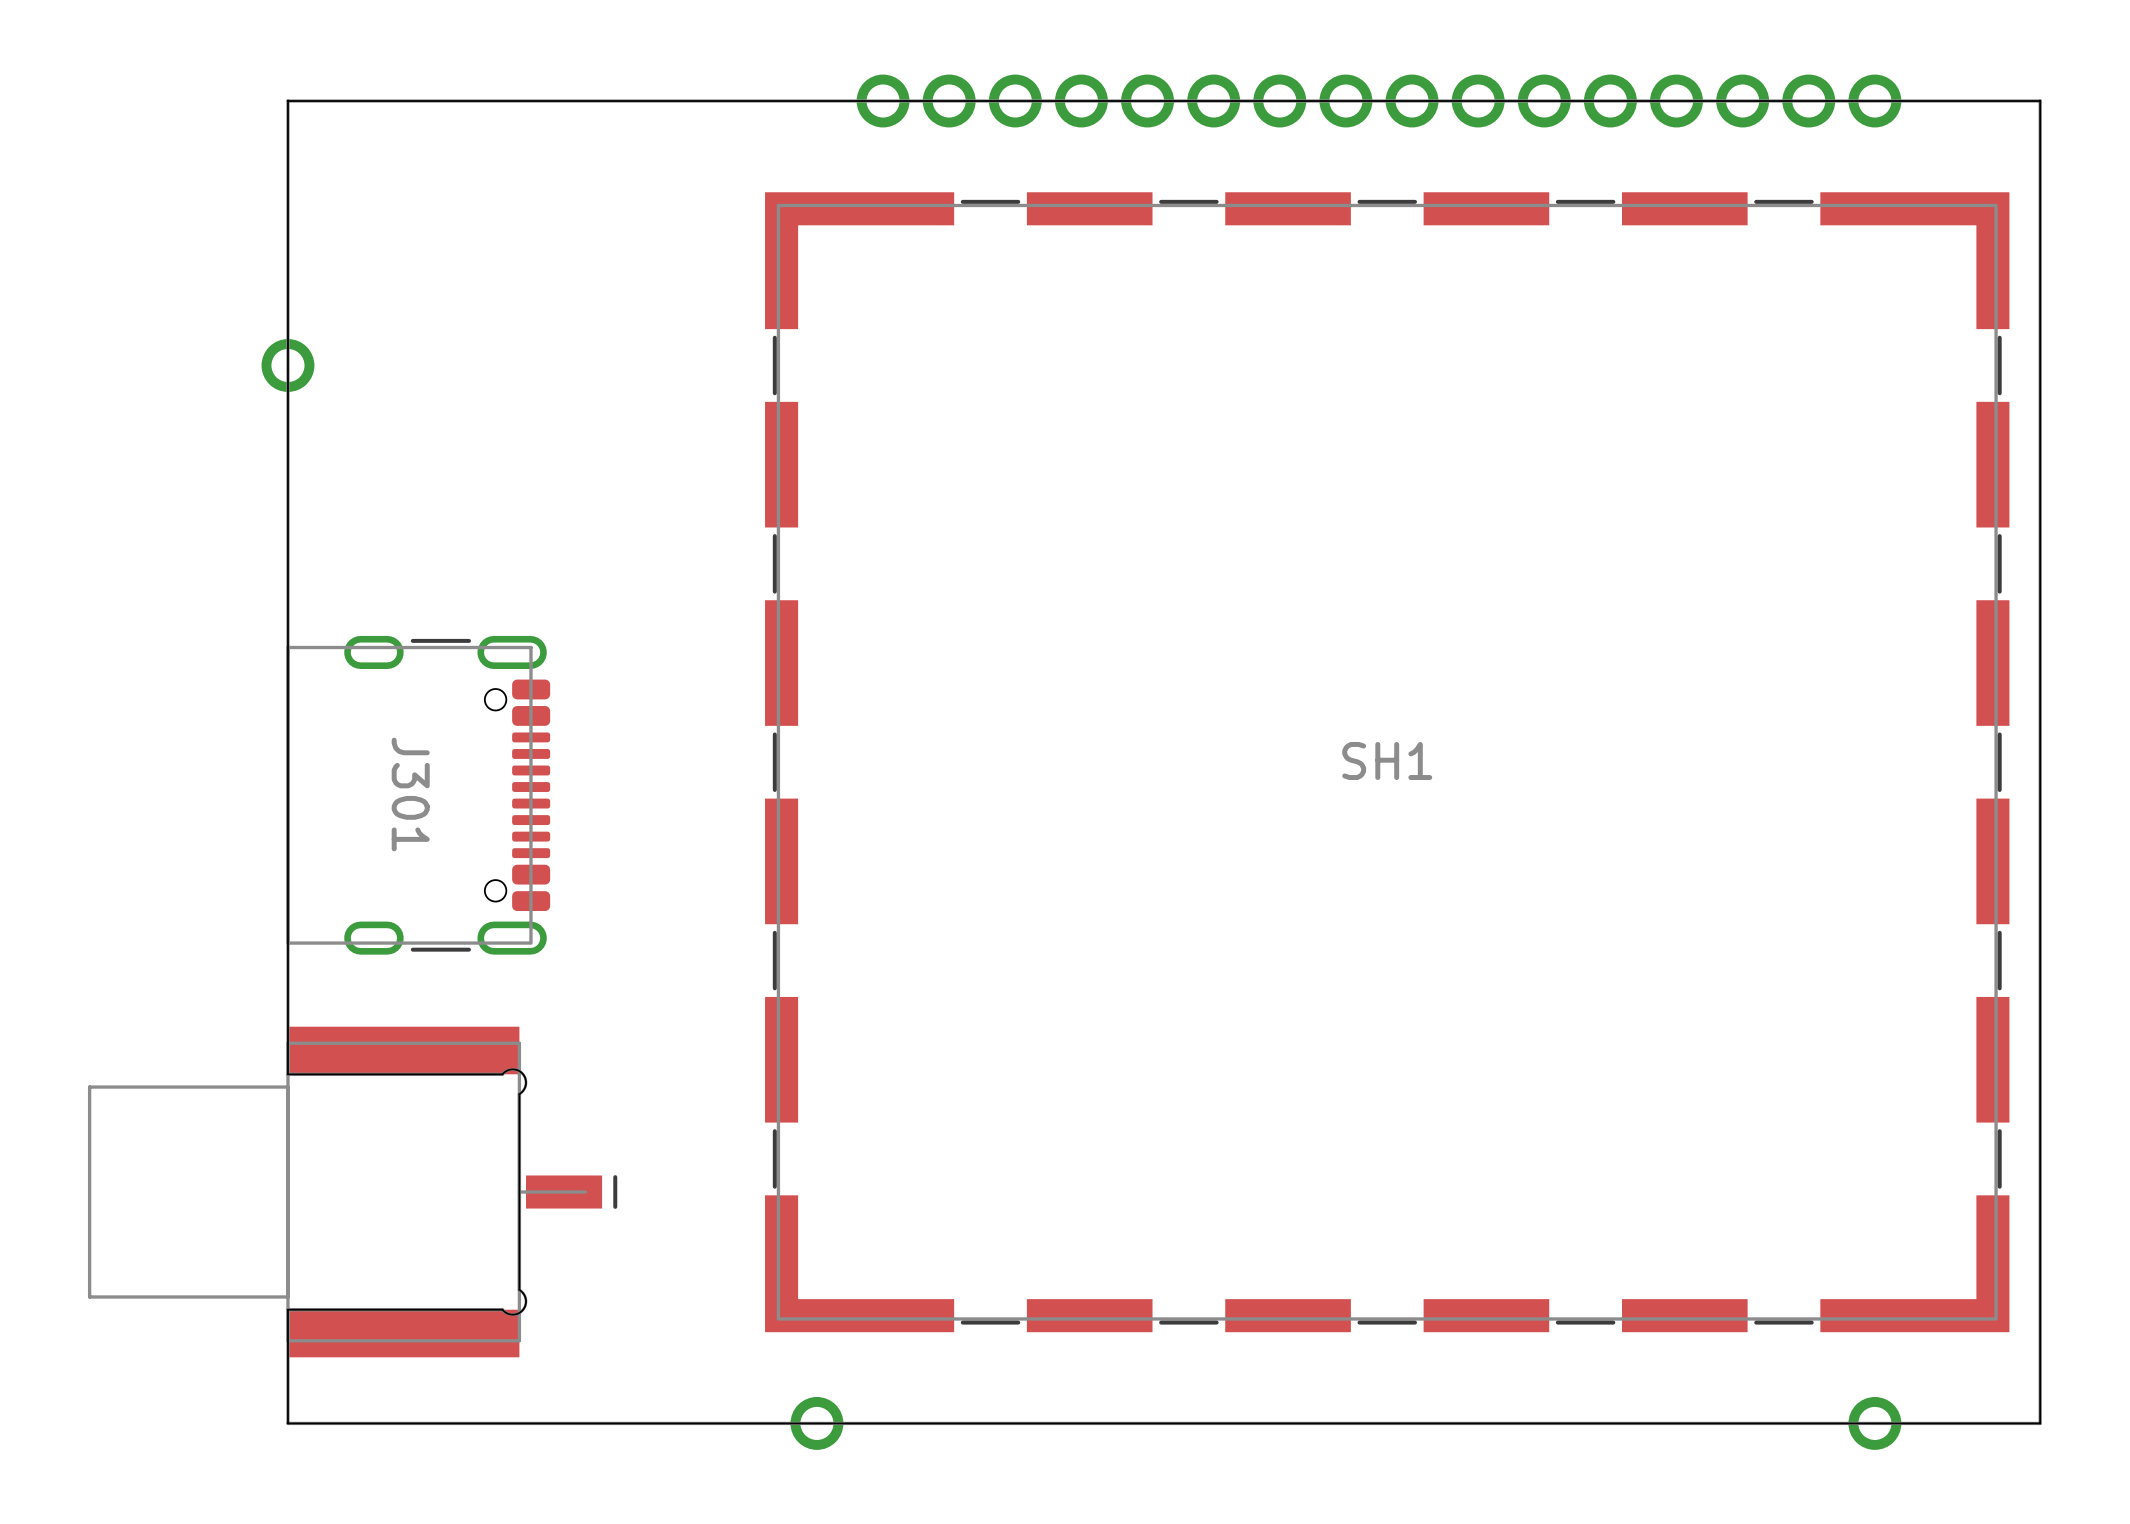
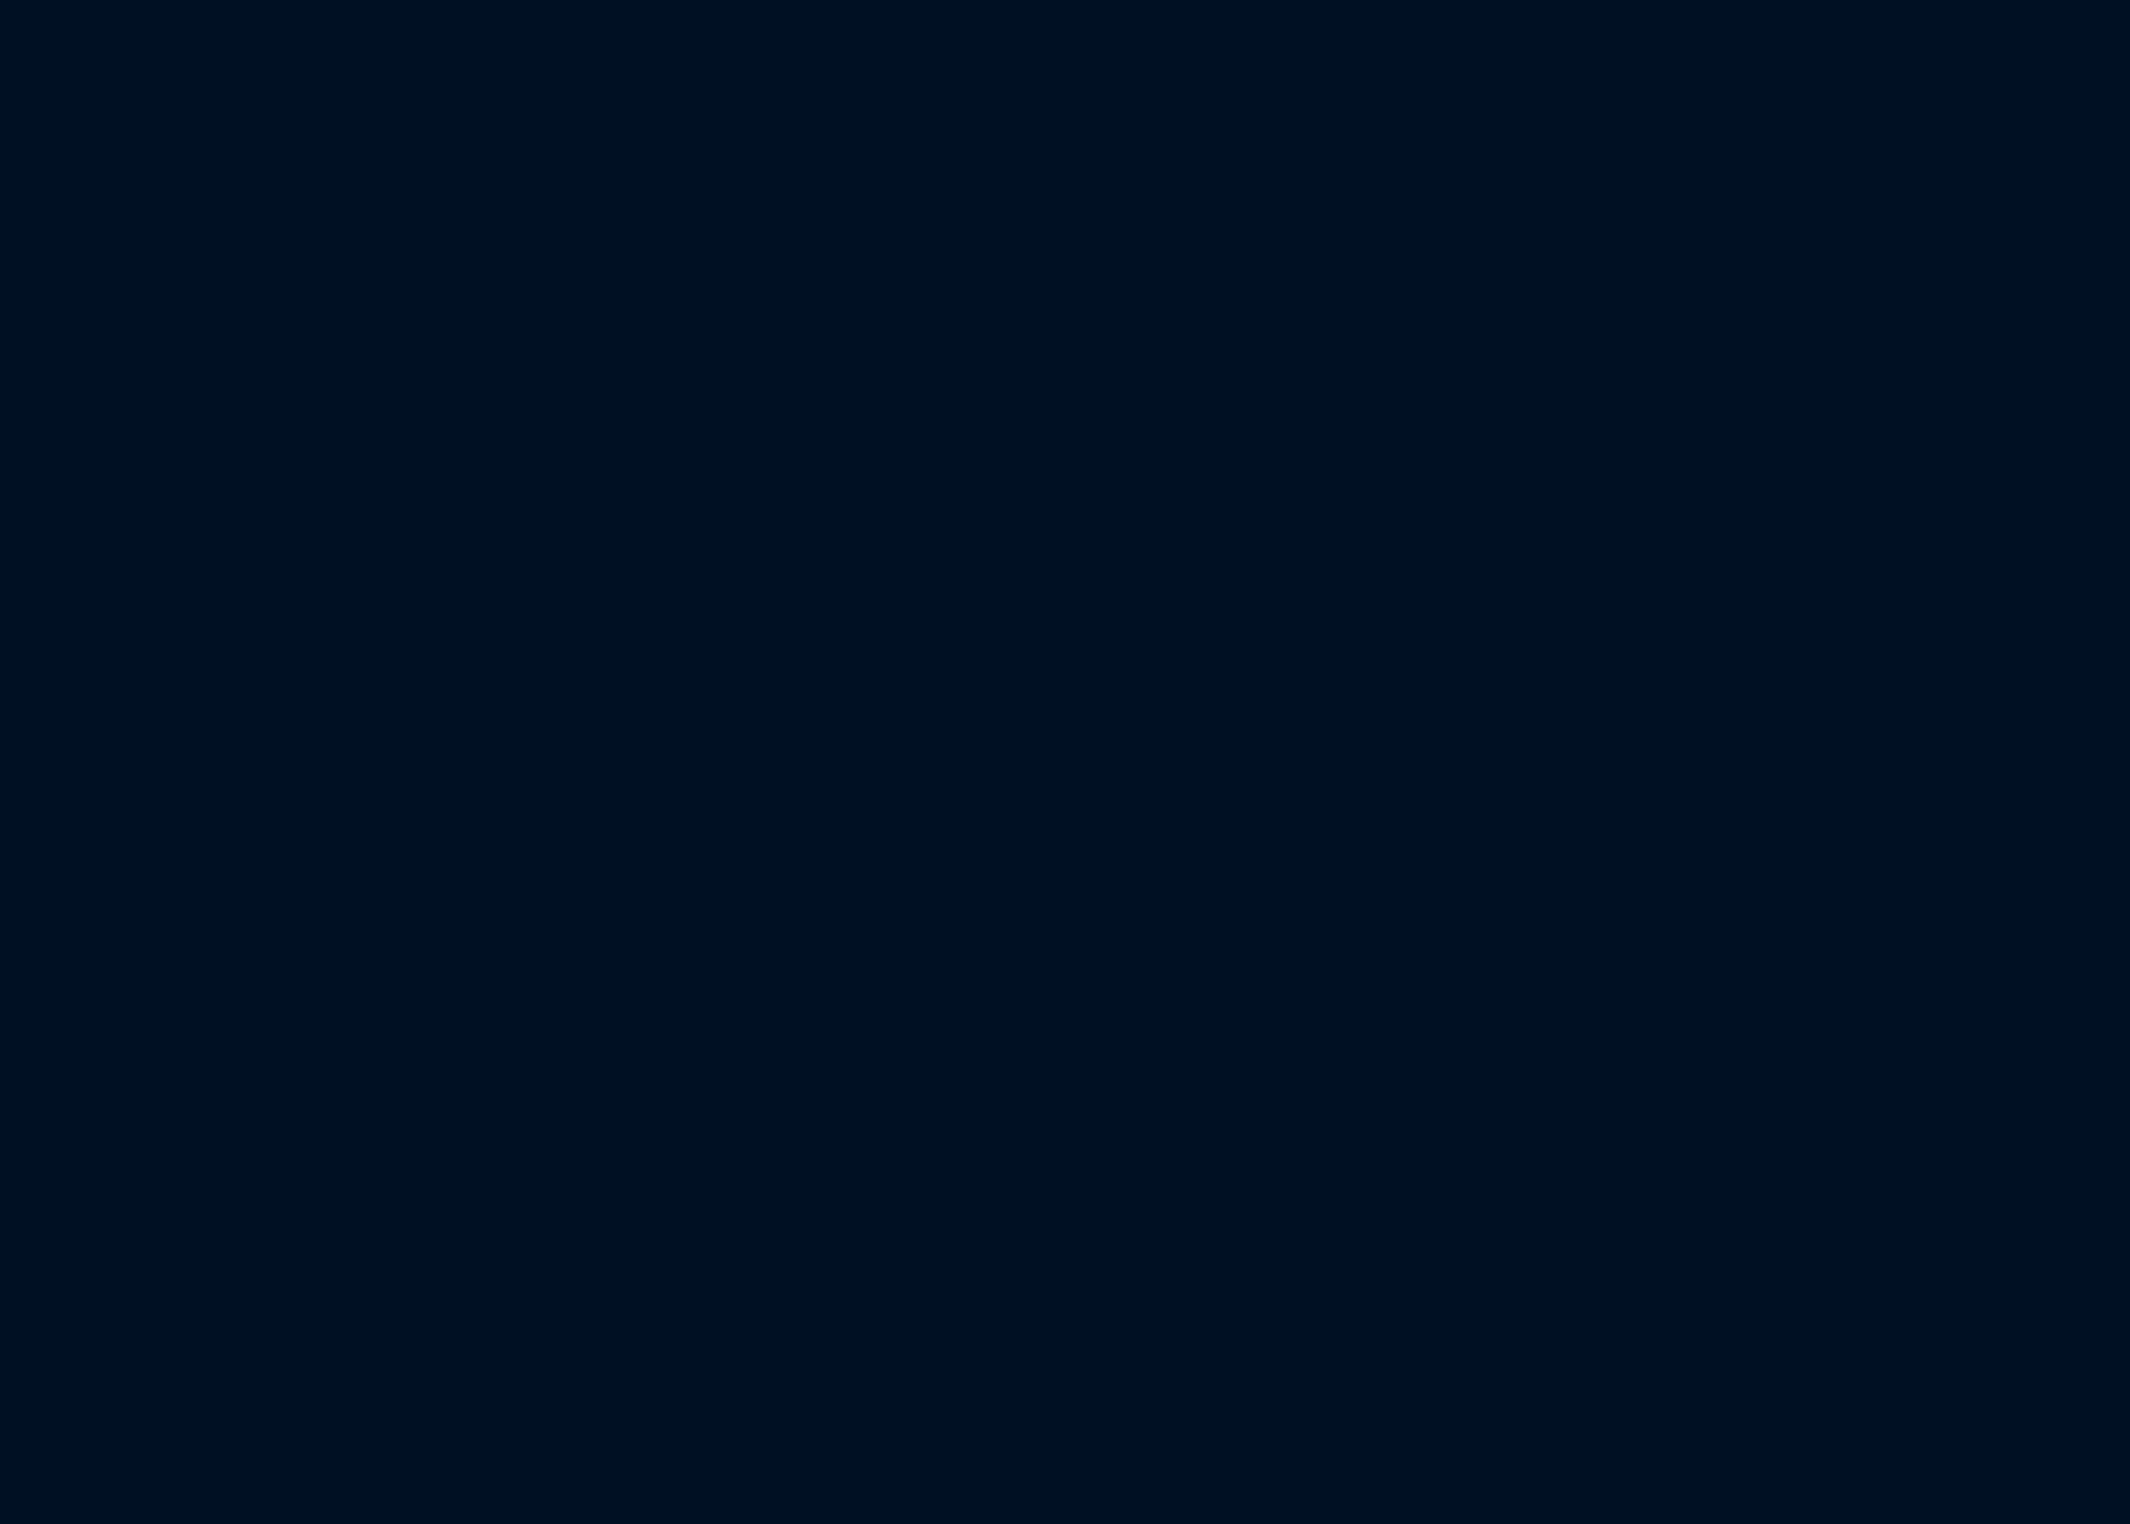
part: (1151, 762) -> none
SH1: (1387, 762) -> none
J301: (418, 795) -> none
part: (352, 1192) -> none

